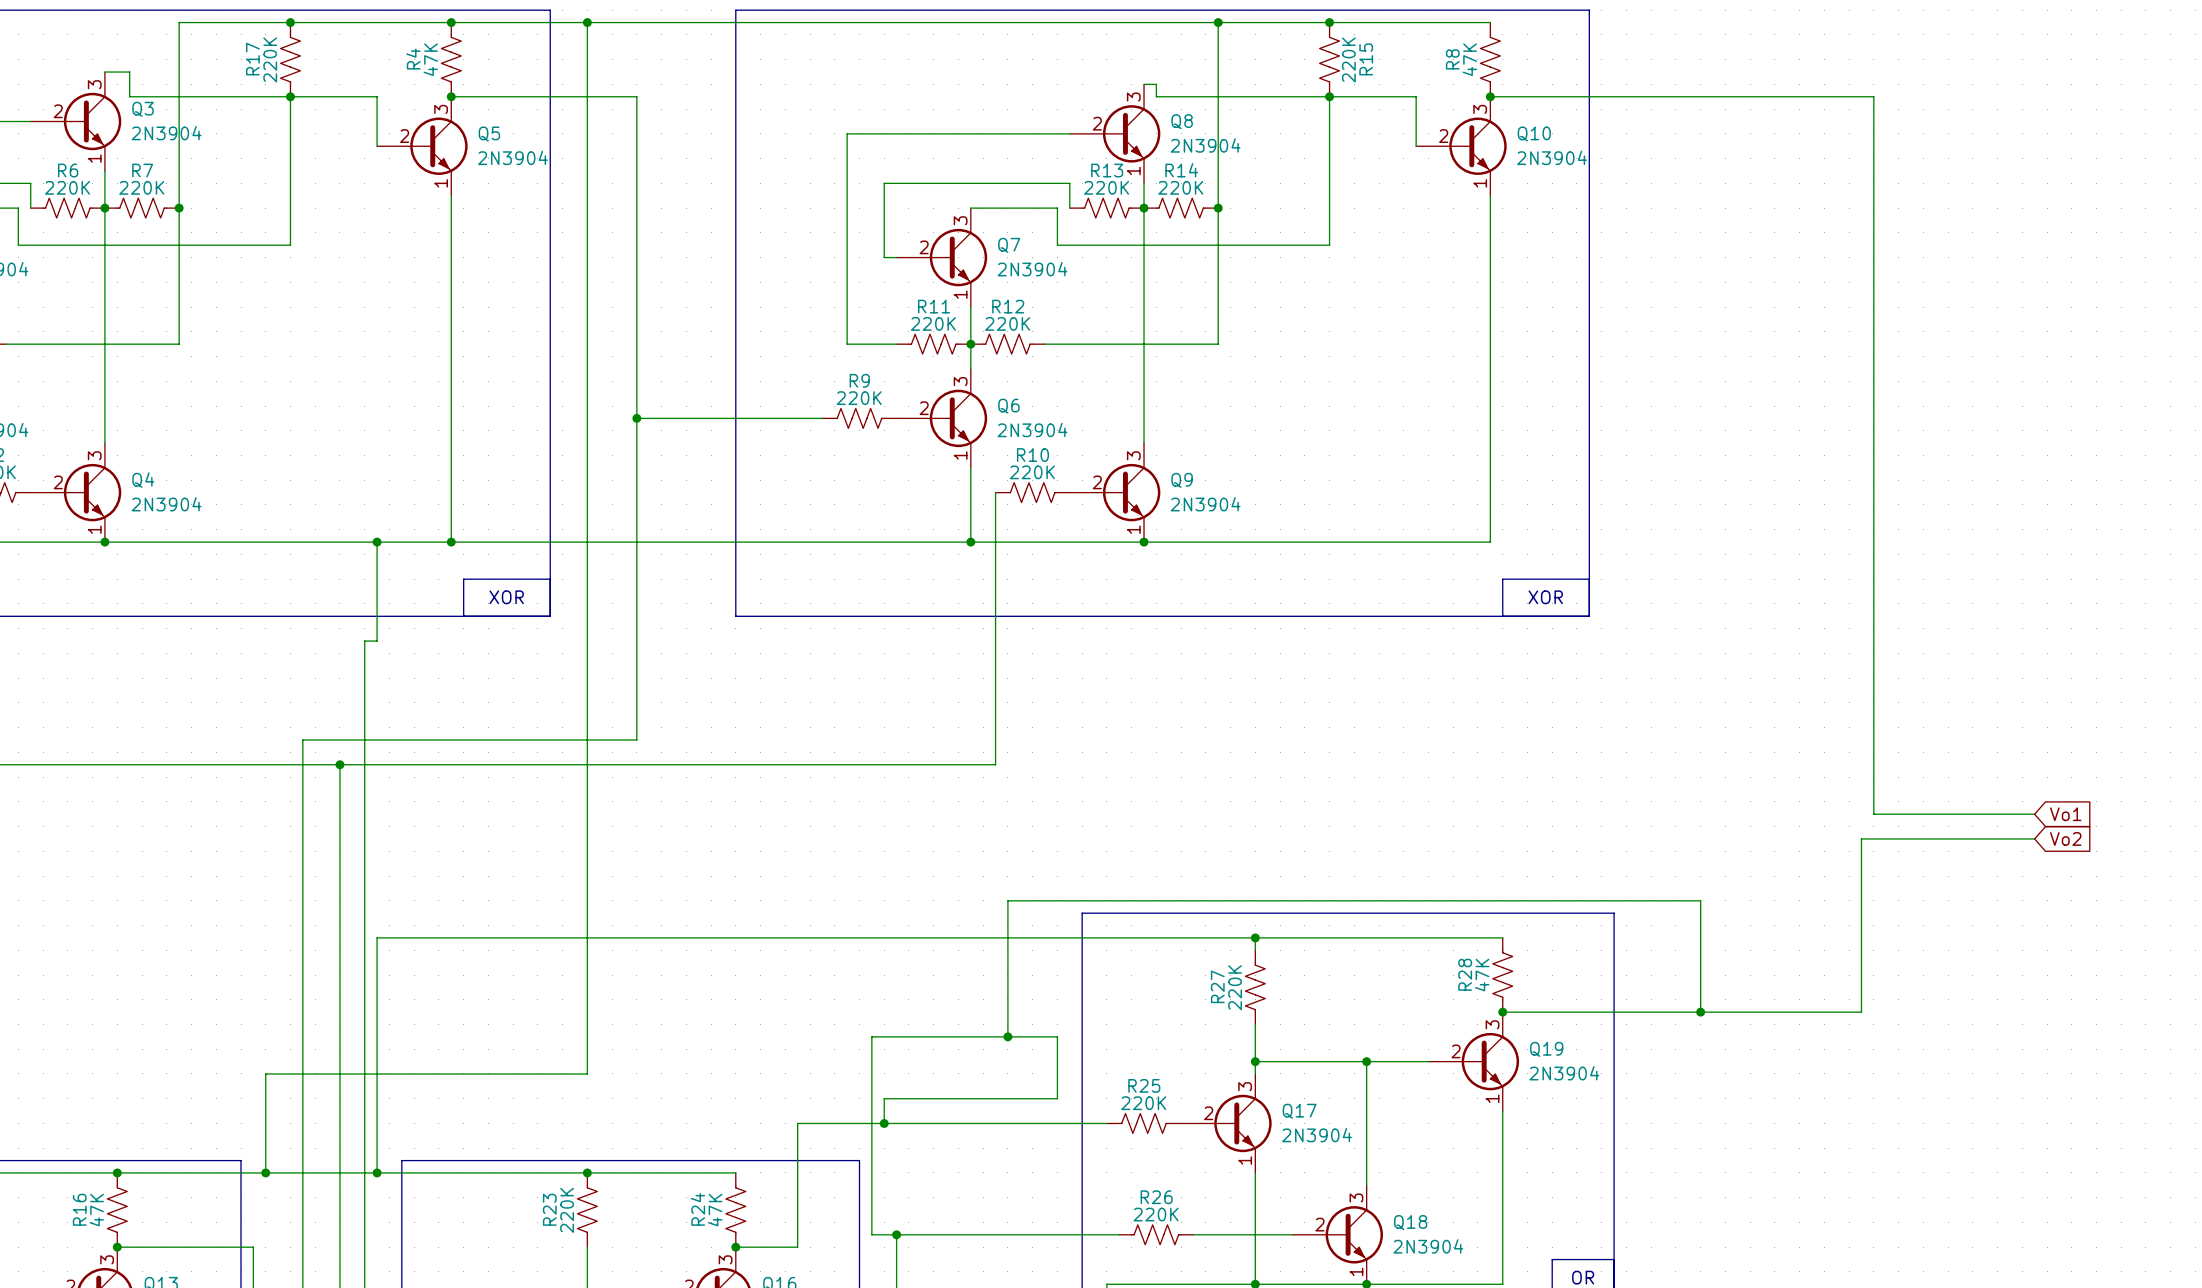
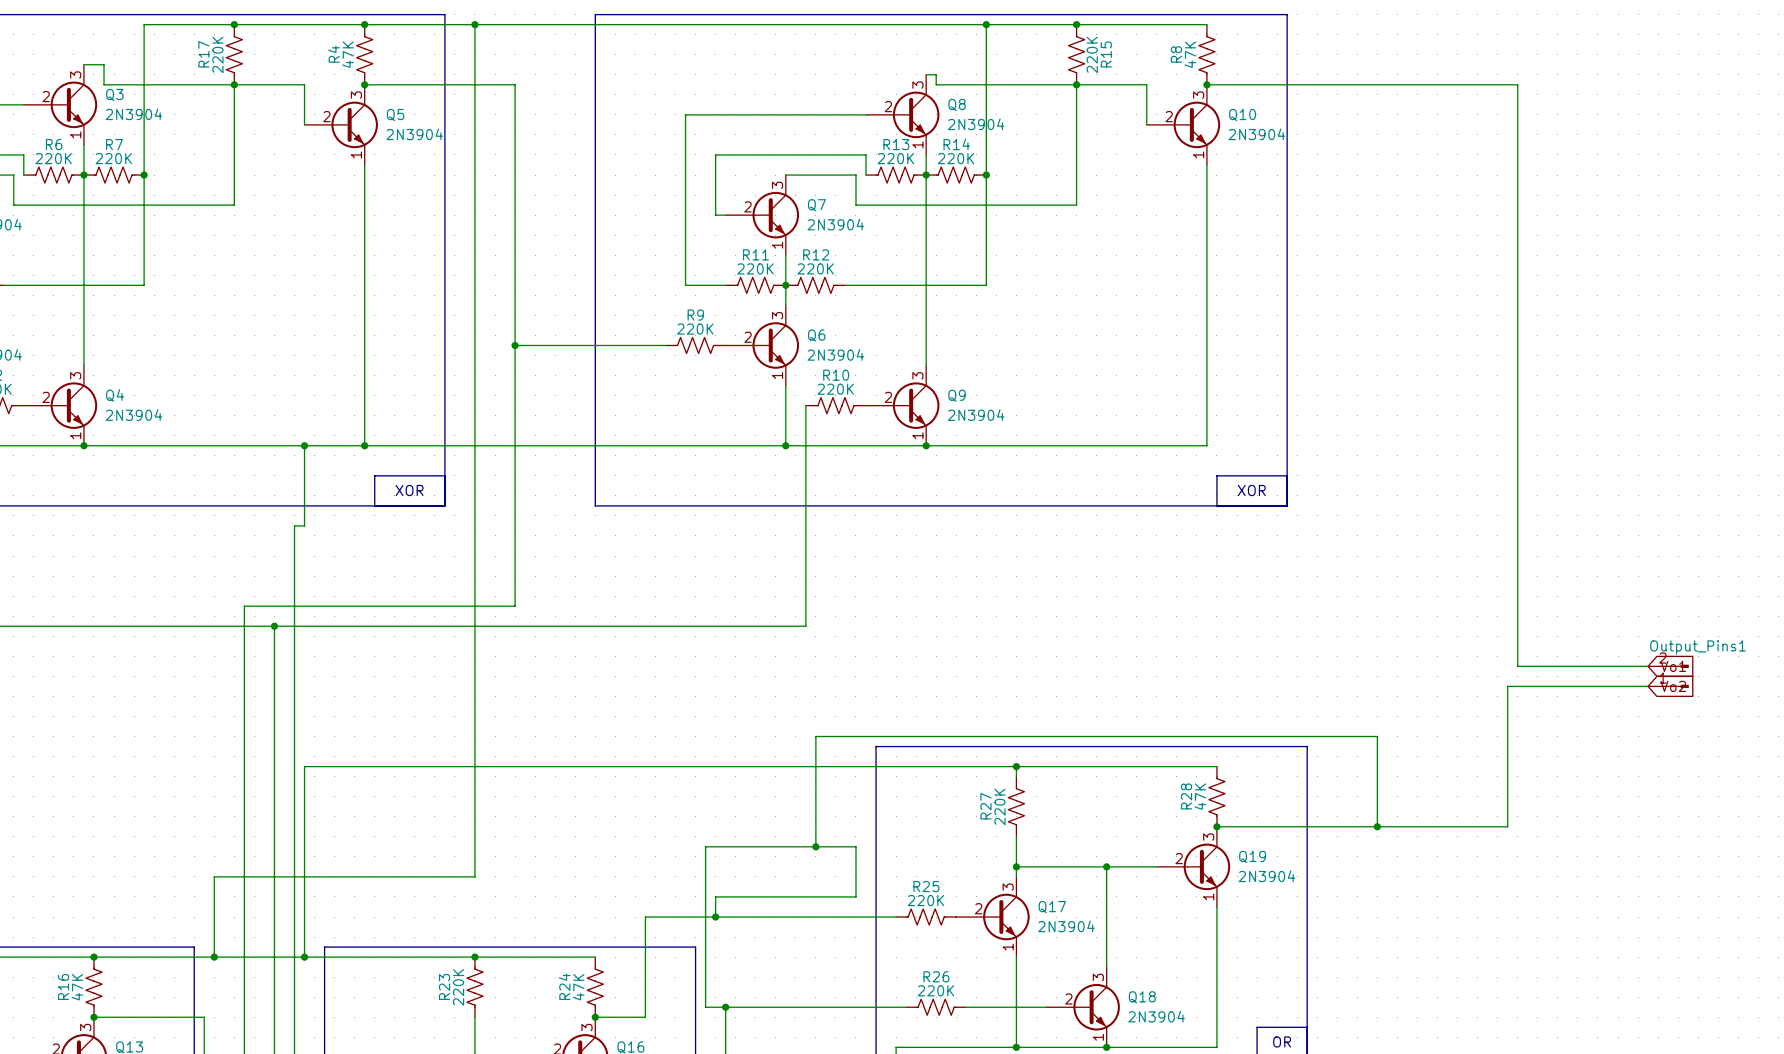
Output_Pins1: none -> (1668, 676)

